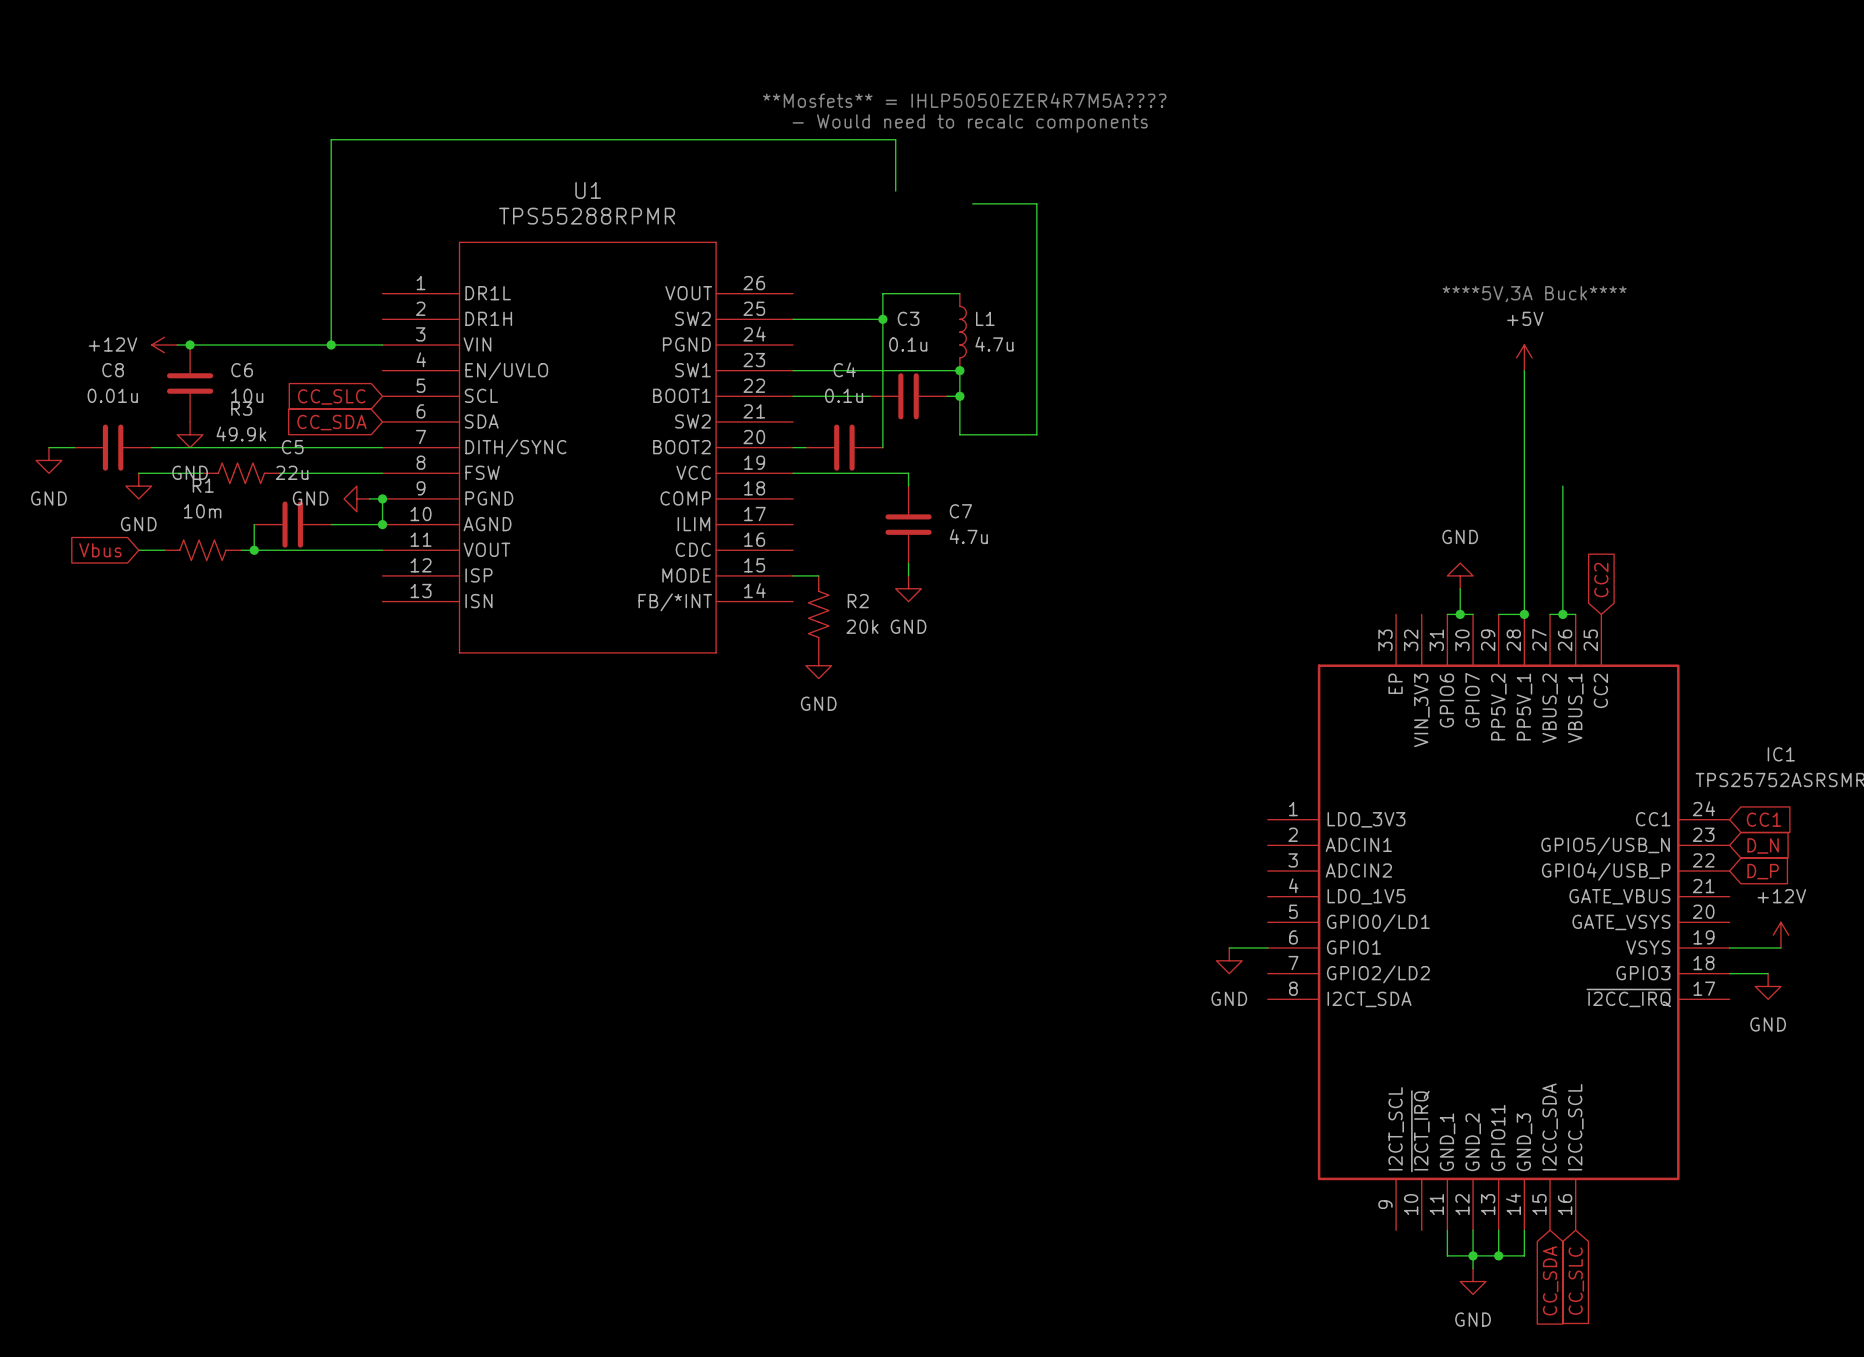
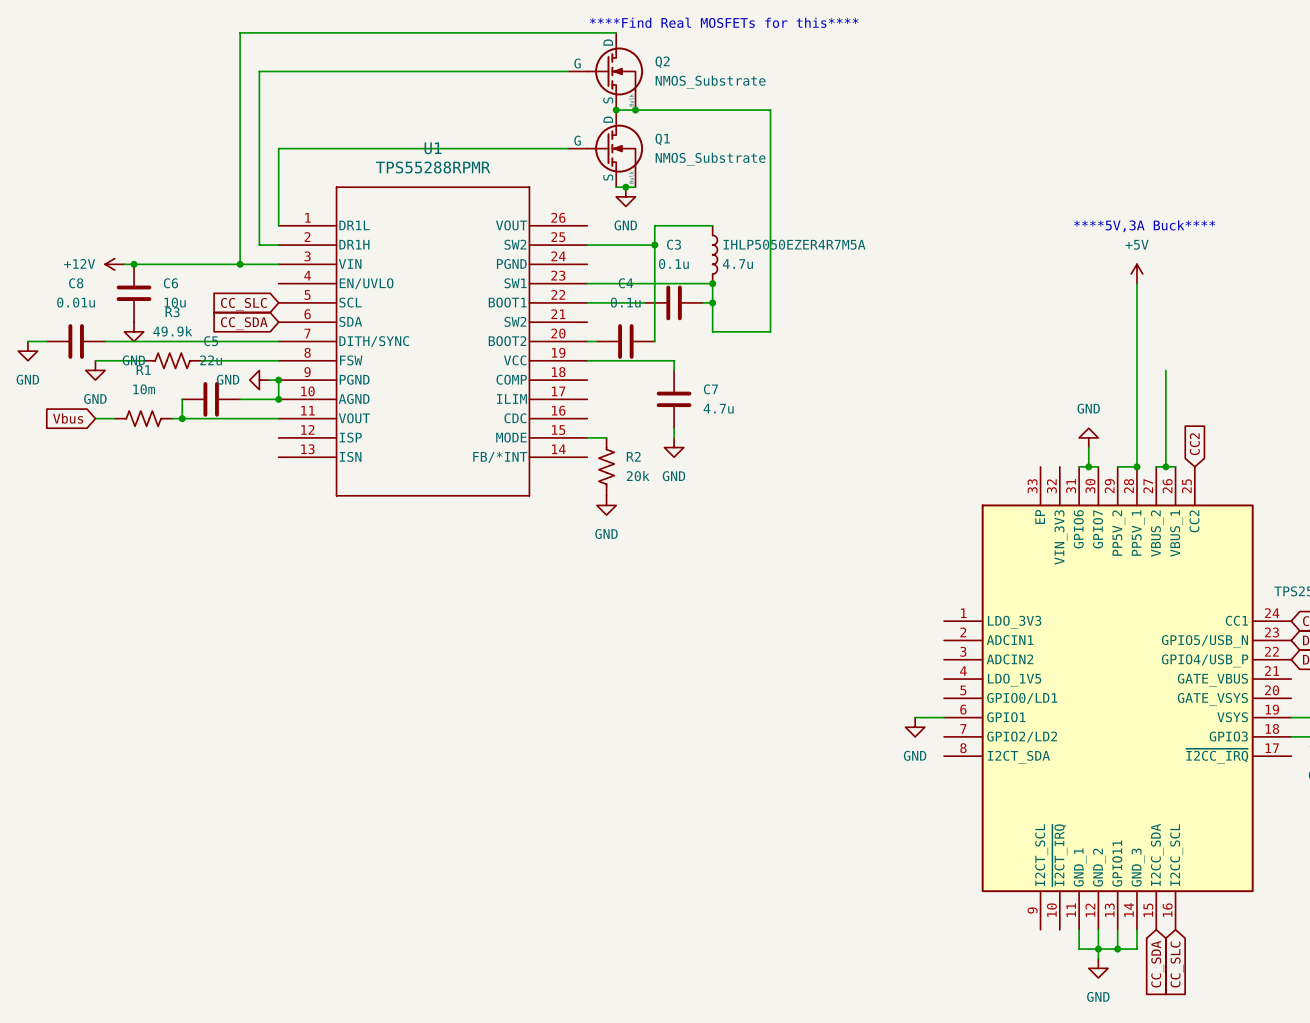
text: none -> ****Find Real MOSFETs for this**** (724, 22)
wire: none -> (567, 71) (259, 71) (259, 245) (278, 245)
Q2: none -> NMOS_Substrate (605, 71)
text: **Mosfets** = IHLP5050EZER4R7M5A???? (964, 100) -> none
text: - Would need to recalc components (970, 123) -> none
wire: (331, 139) (831, 139) -> (240, 110) (240, 32) (616, 32)
junction: none -> (616, 110)
junction: none -> (635, 110)
wire: (895, 139) (895, 191) -> none
wire: none -> (567, 148) (278, 148) (278, 225)
Q1: none -> NMOS_Substrate (605, 148)
wire: (972, 203) (1036, 203) -> (664, 110) (770, 110) (770, 158)
wire: none -> (616, 187) (635, 187)
junction: none -> (625, 187)
power symbol: none -> GND (625, 196)
L1 name: L1 (985, 318) -> IHLP5050EZER4R7M5A (794, 244)

